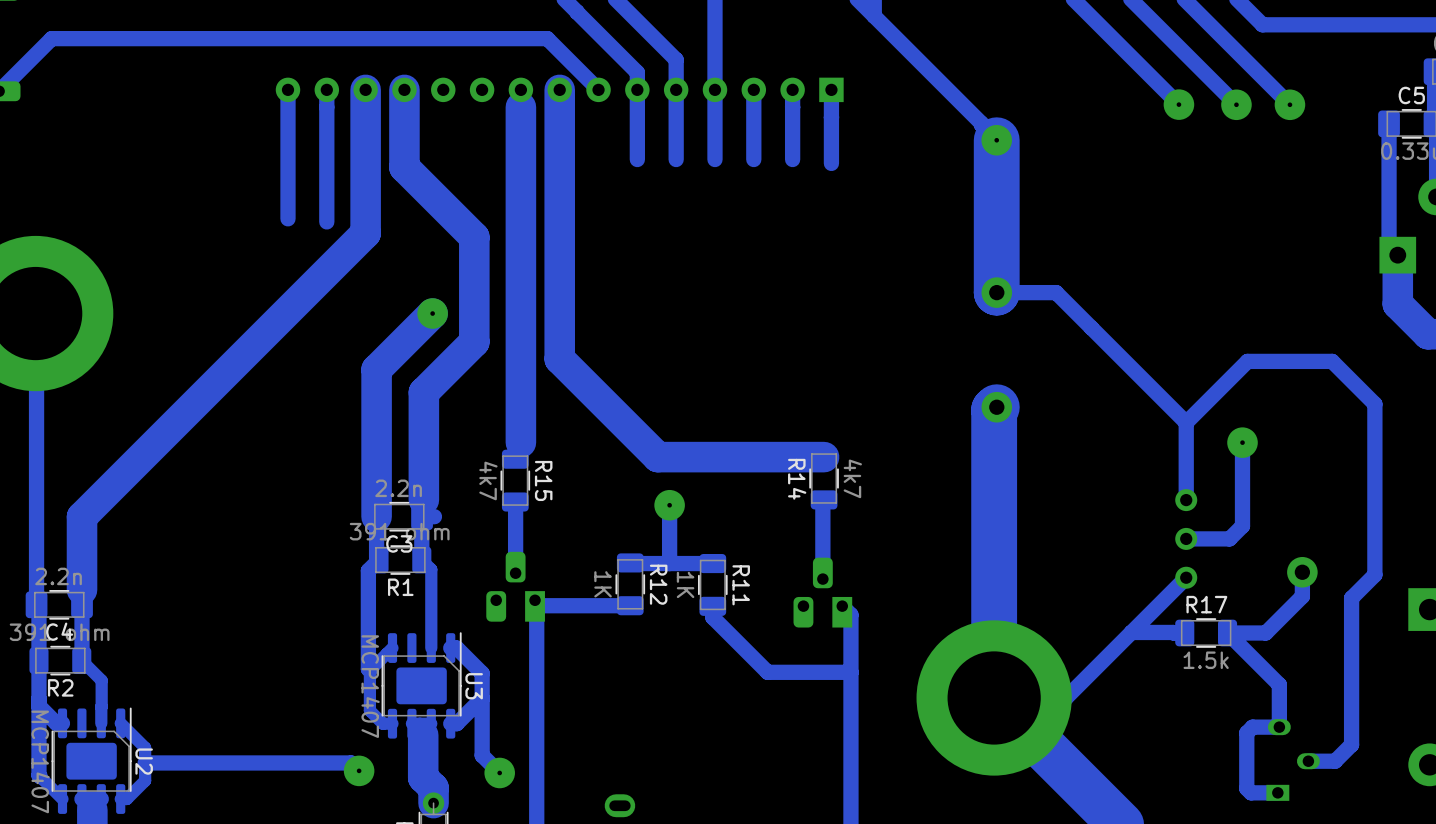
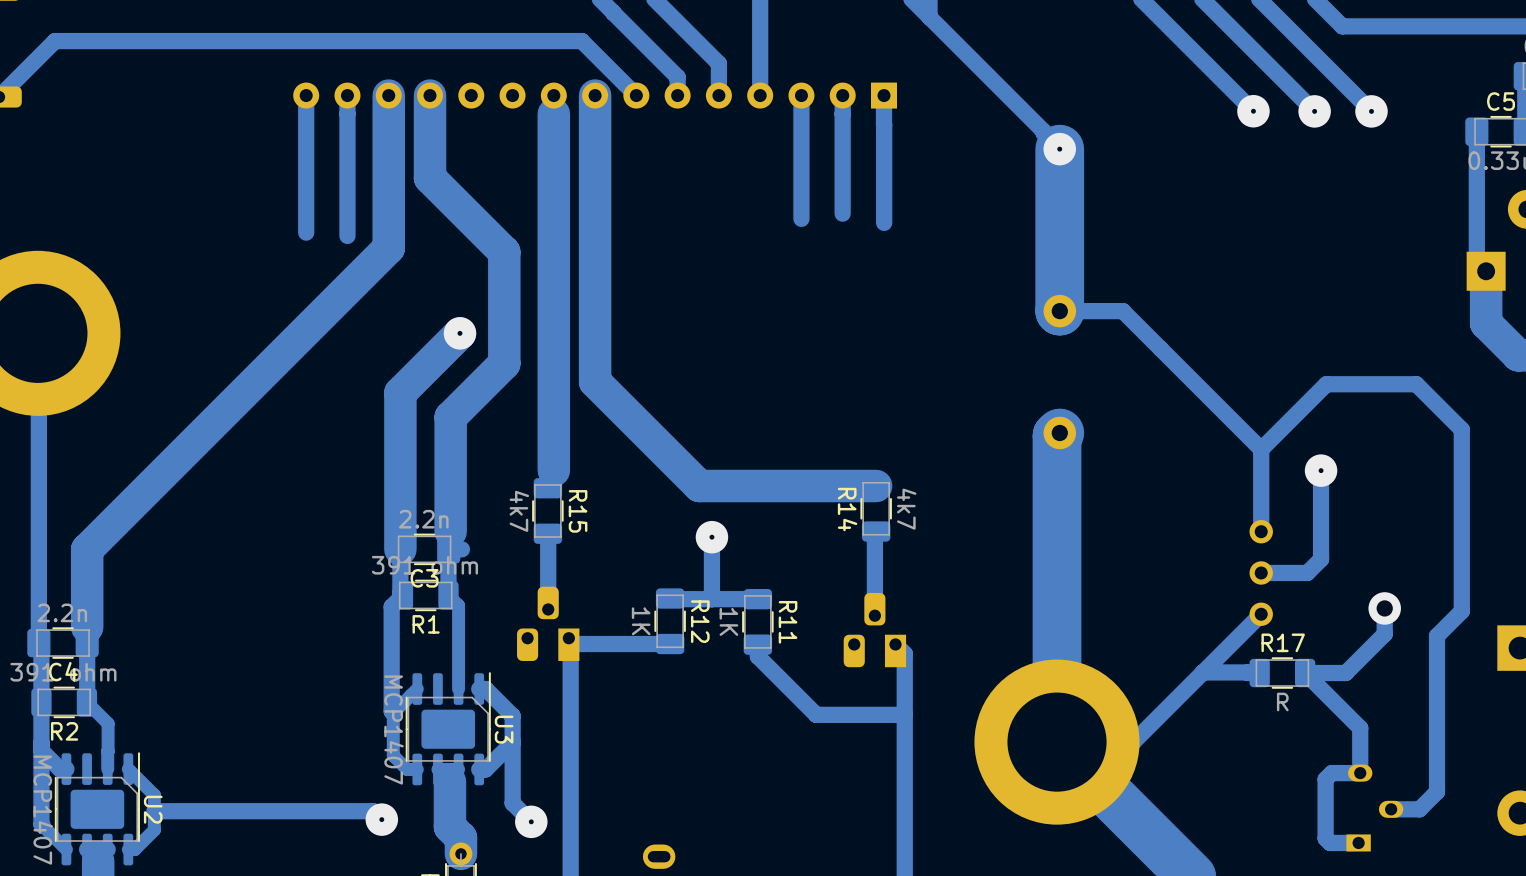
track: (637, 89) (637, 159) -> none
track: (676, 89) (676, 159) -> none
track: (714, 89) (714, 159) -> none
track: (792, 107) (792, 159) -> (842, 114) (842, 213)
track: (831, 117) (831, 163) -> (884, 124) (884, 222)
track: none -> (801, 169) (801, 218)
R17 value: 1.5k (1206, 660) -> R (1282, 701)

